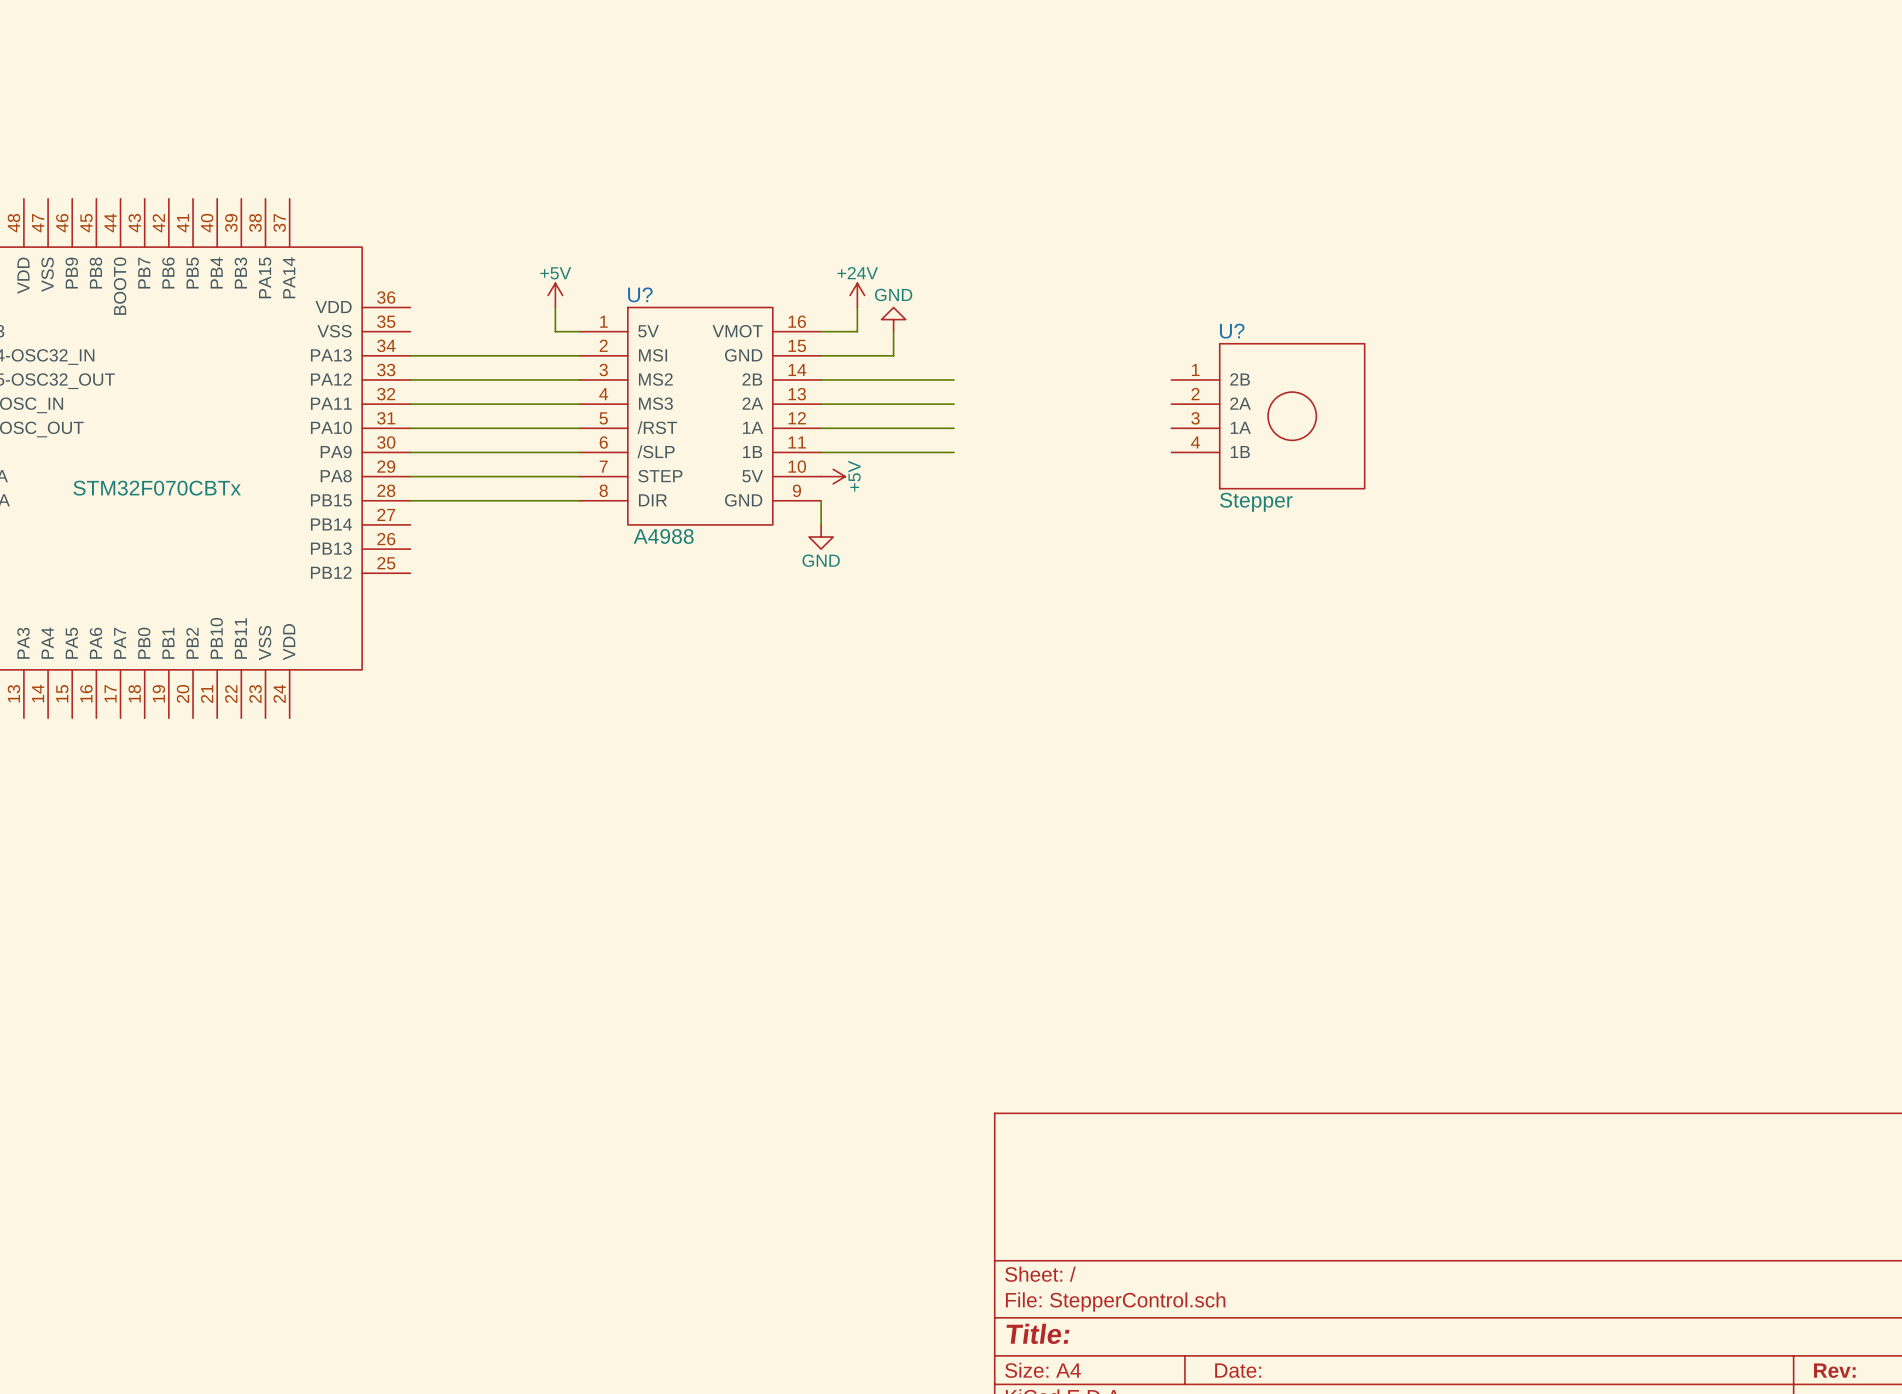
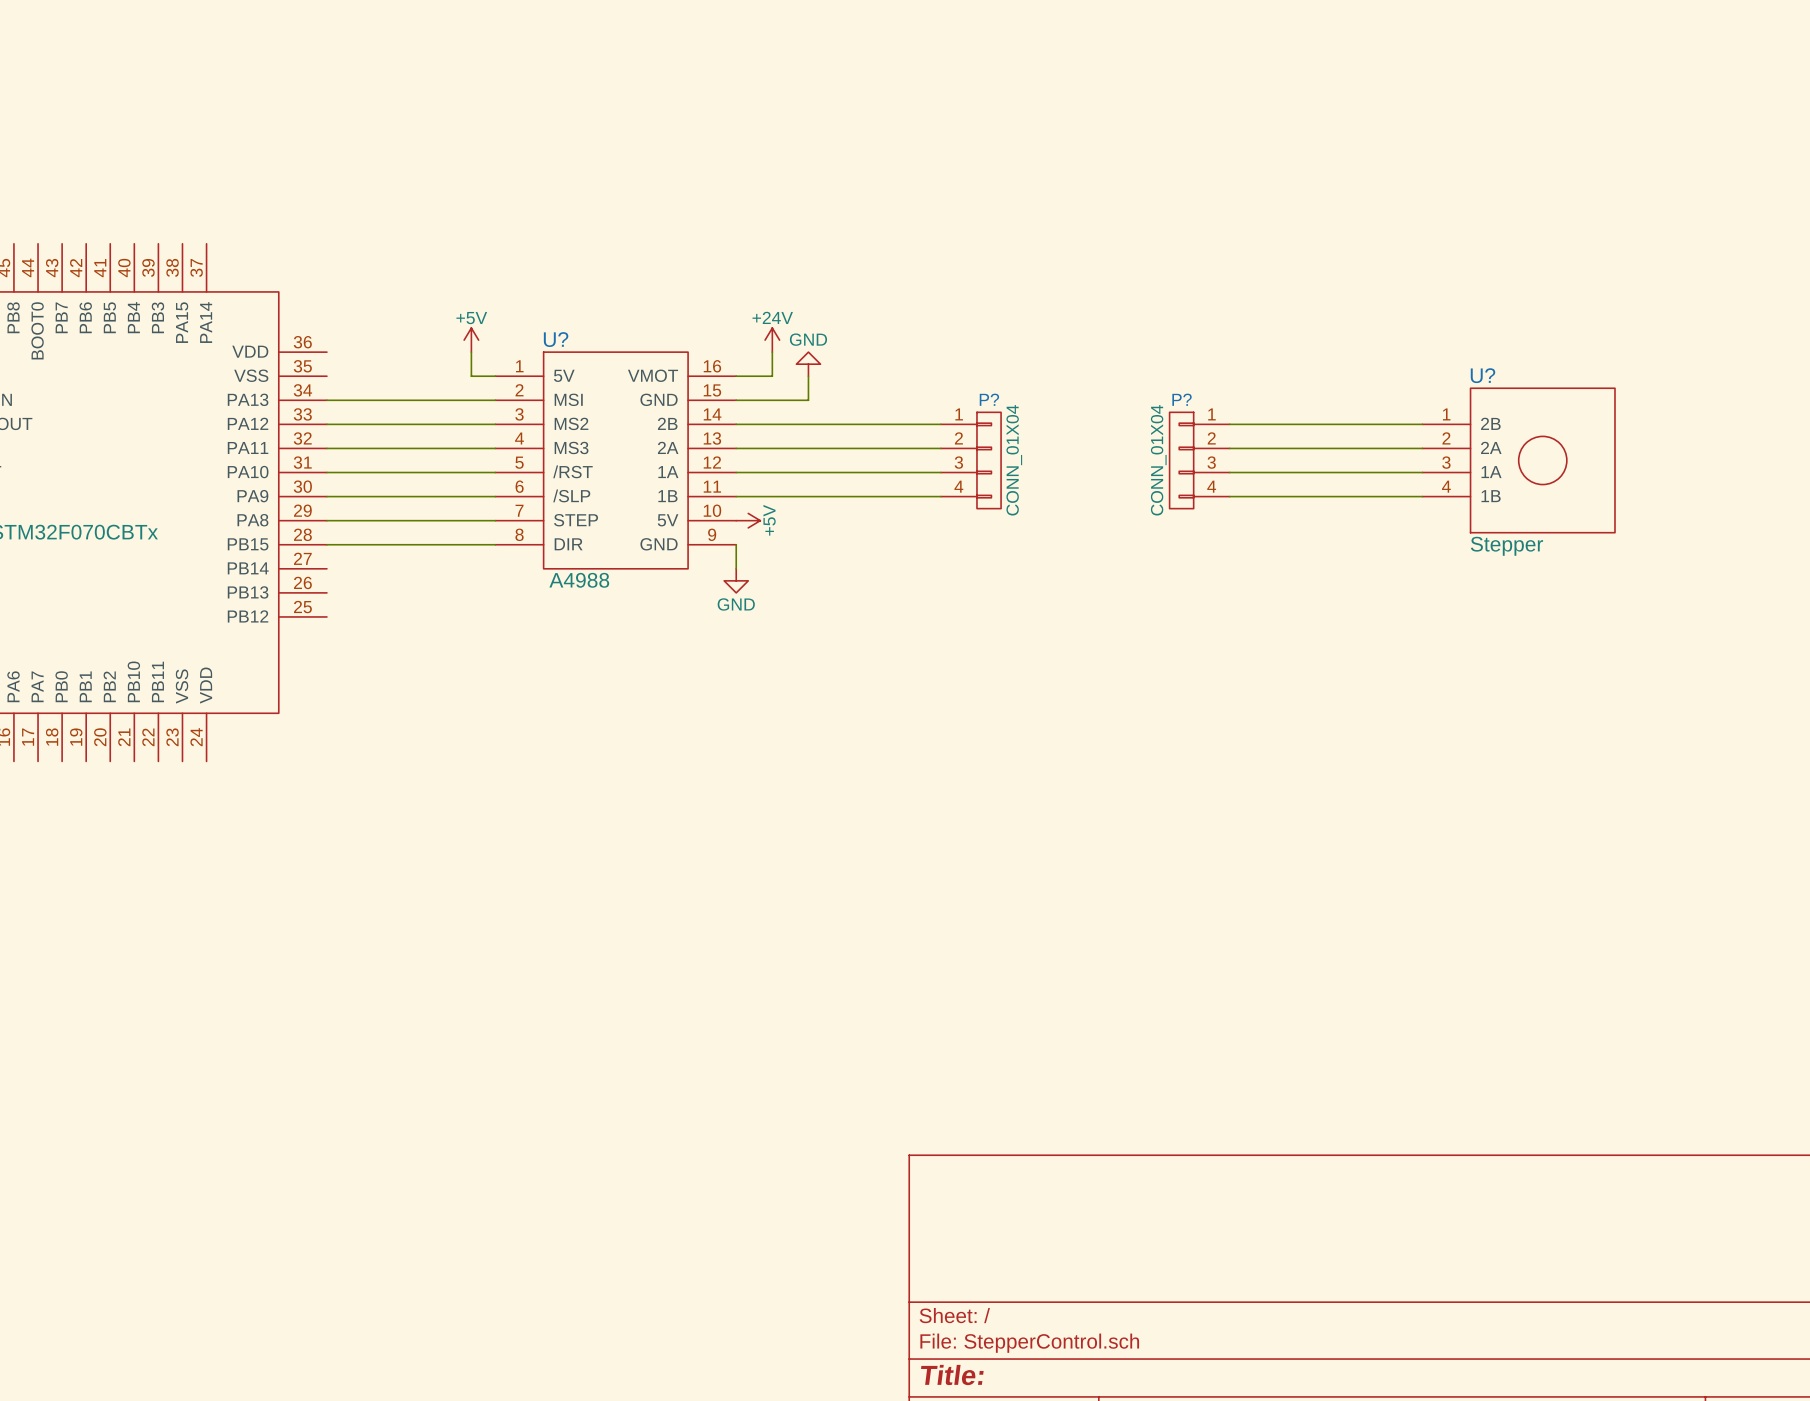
wire: none -> (868, 424) (940, 424)
wire: none -> (1229, 424) (1422, 424)
wire: none -> (868, 448) (940, 448)
wire: none -> (1229, 448) (1422, 448)
P?: none -> CONN_01X04 (970, 460)
U?: Stepper (1268, 416) -> none
P?: none -> CONN_01X04 (1199, 460)
U?: none -> Stepper (1518, 460)
wire: none -> (868, 472) (940, 472)
wire: none -> (1229, 472) (1422, 472)
wire: none -> (868, 496) (940, 496)
wire: none -> (1229, 496) (1422, 496)

